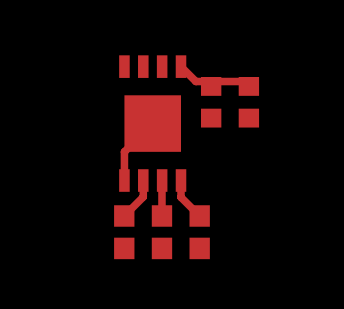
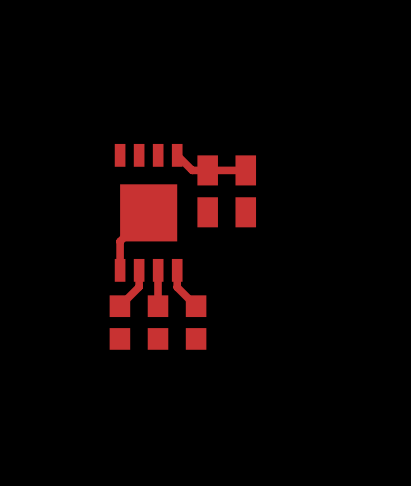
part footprint: [200, 77, 222, 128] -> [197, 155, 218, 228]
part footprint: [238, 77, 260, 128] -> [235, 155, 257, 228]

